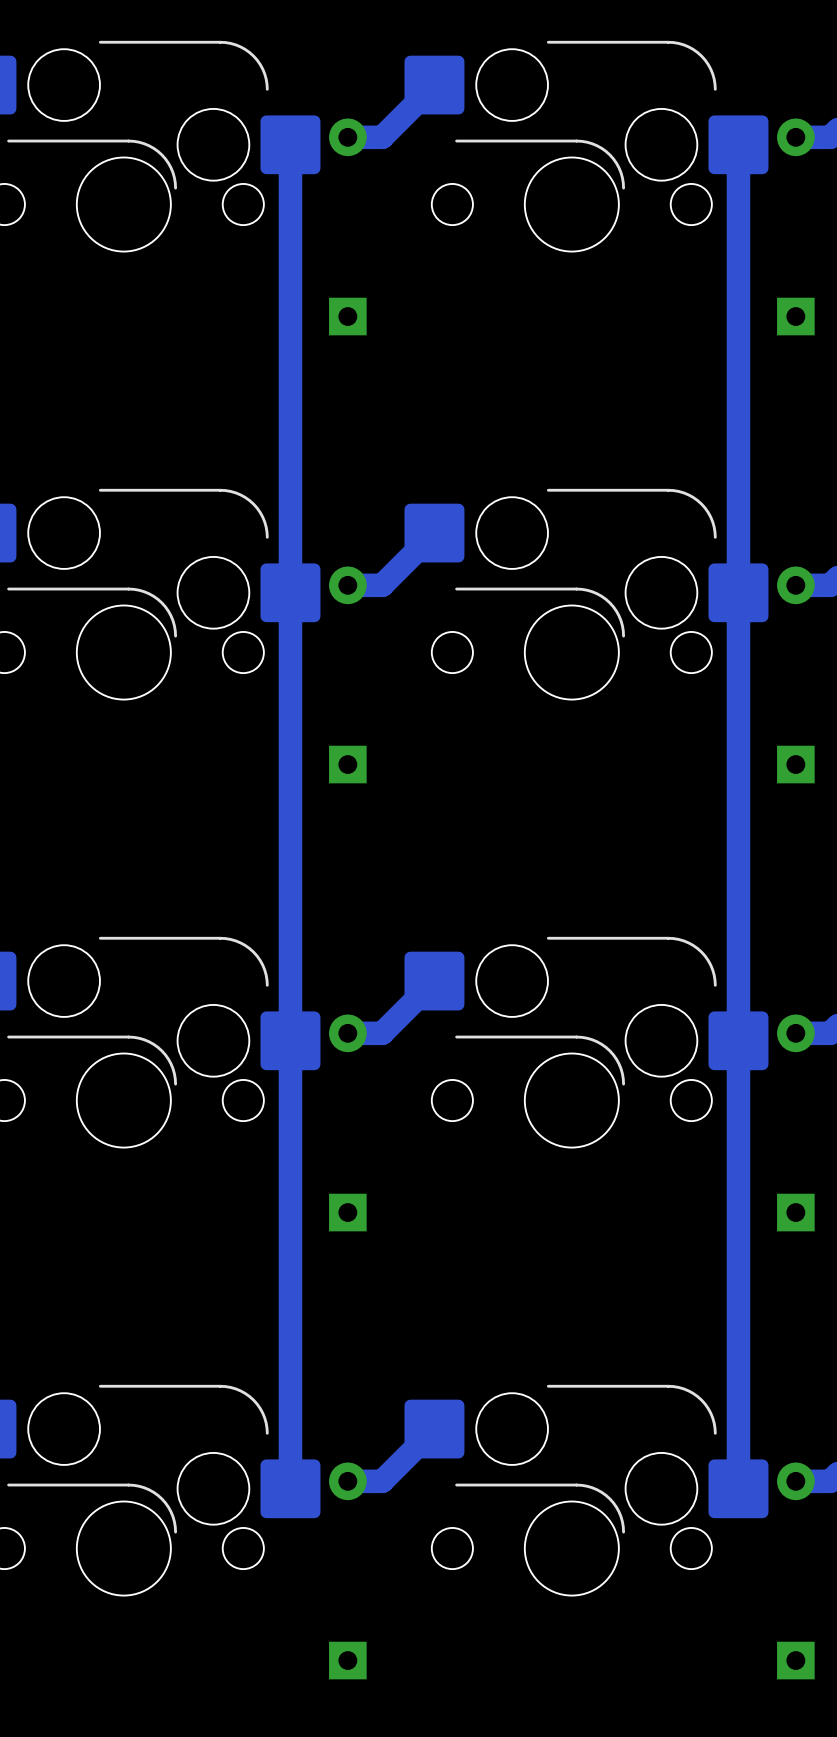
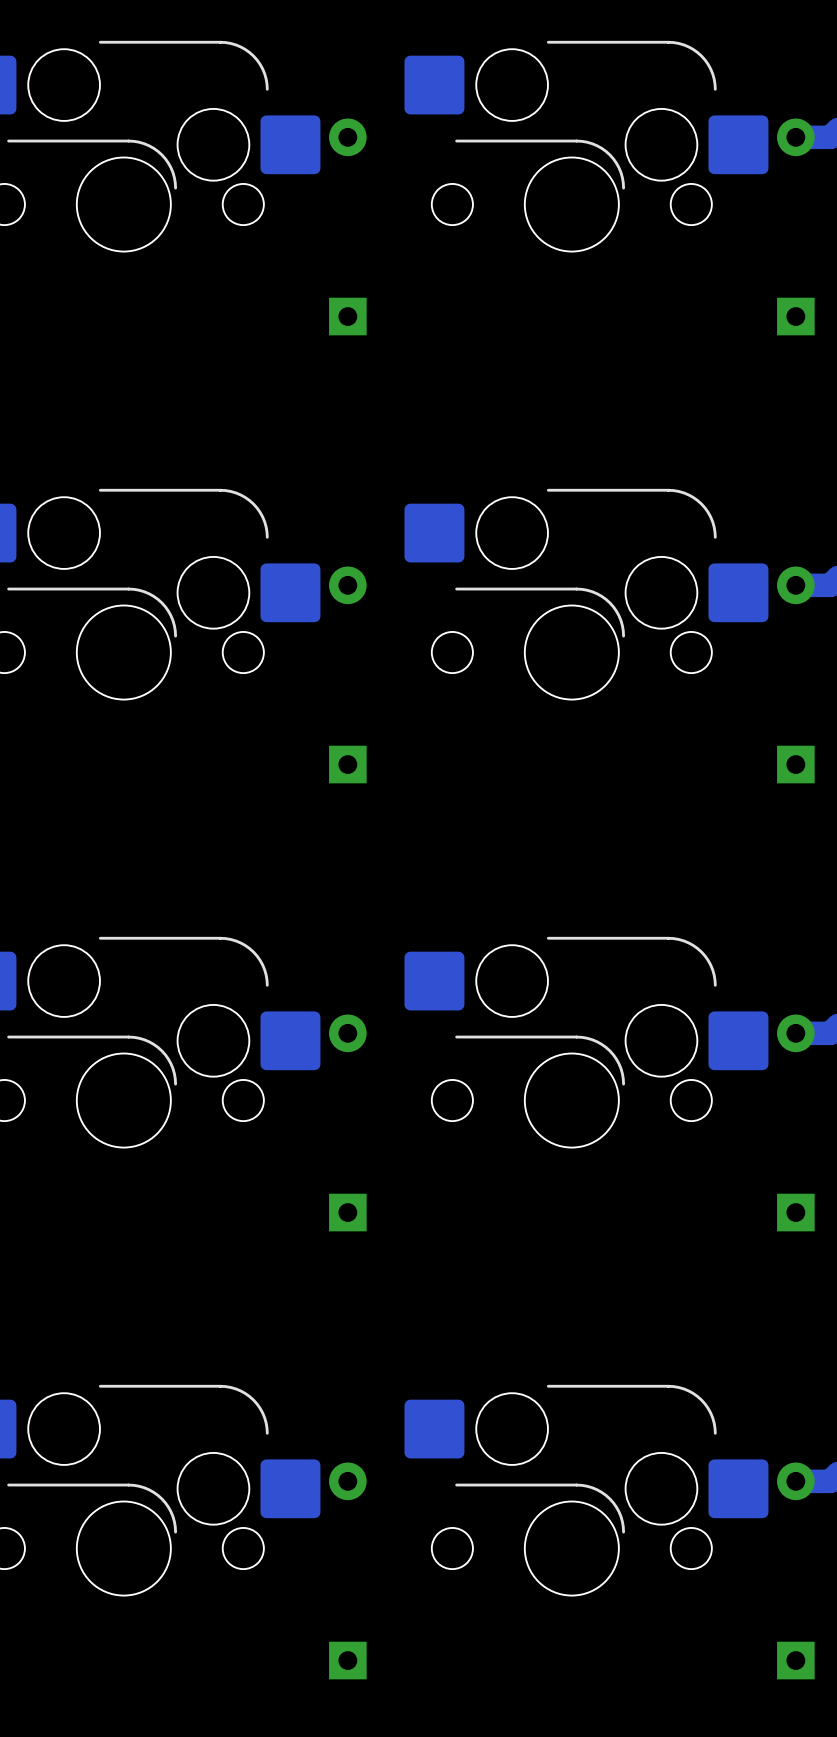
track: (434, 85) (382, 137) (347, 137) -> none
track: (290, 144) (290, 1488) -> none
track: (738, 144) (738, 1488) -> none
track: (434, 533) (382, 585) (347, 585) -> none
track: (434, 981) (382, 1033) (347, 1033) -> none
track: (434, 1429) (382, 1481) (347, 1481) -> none

